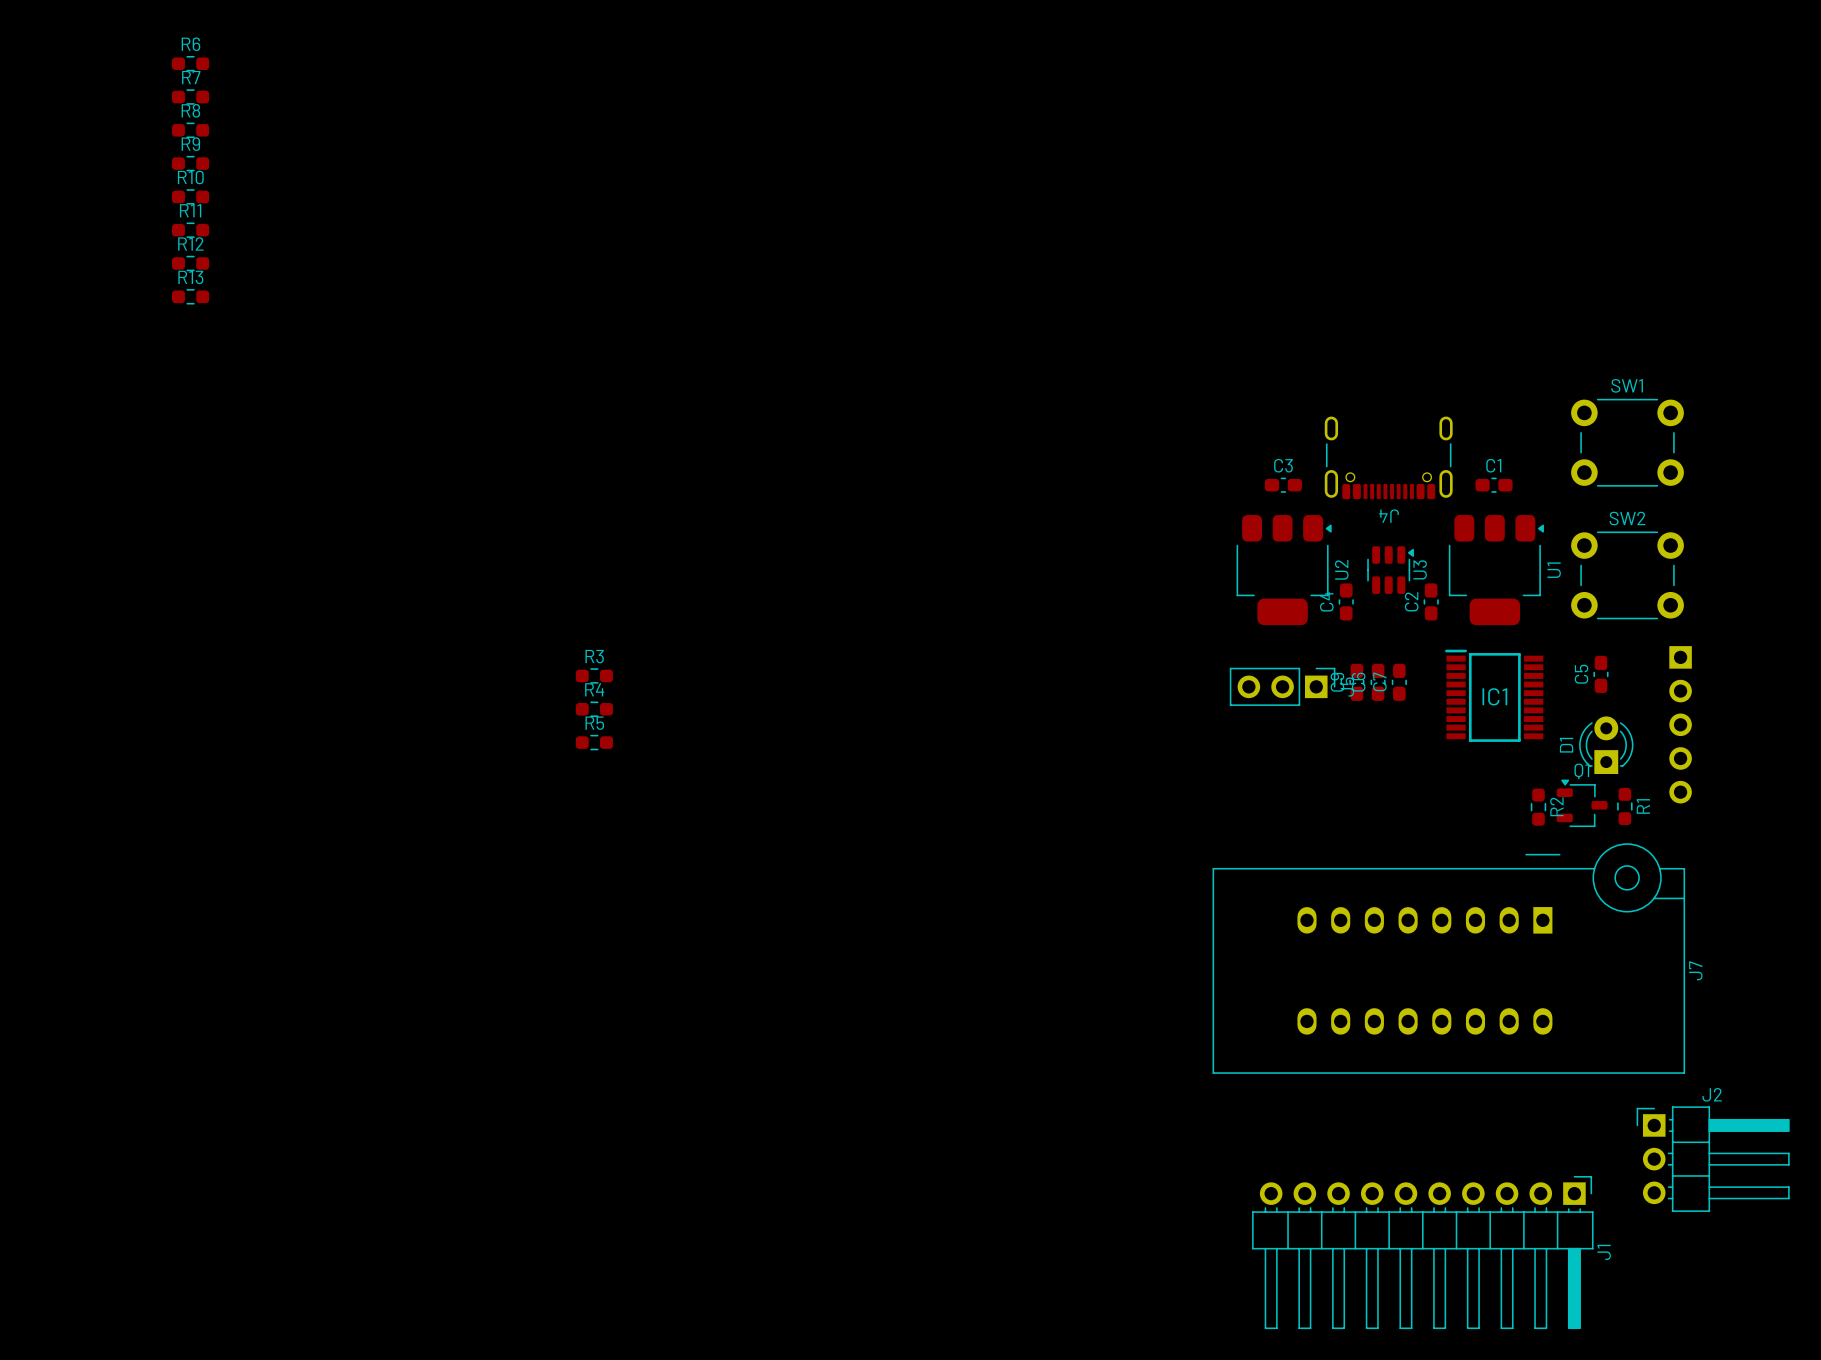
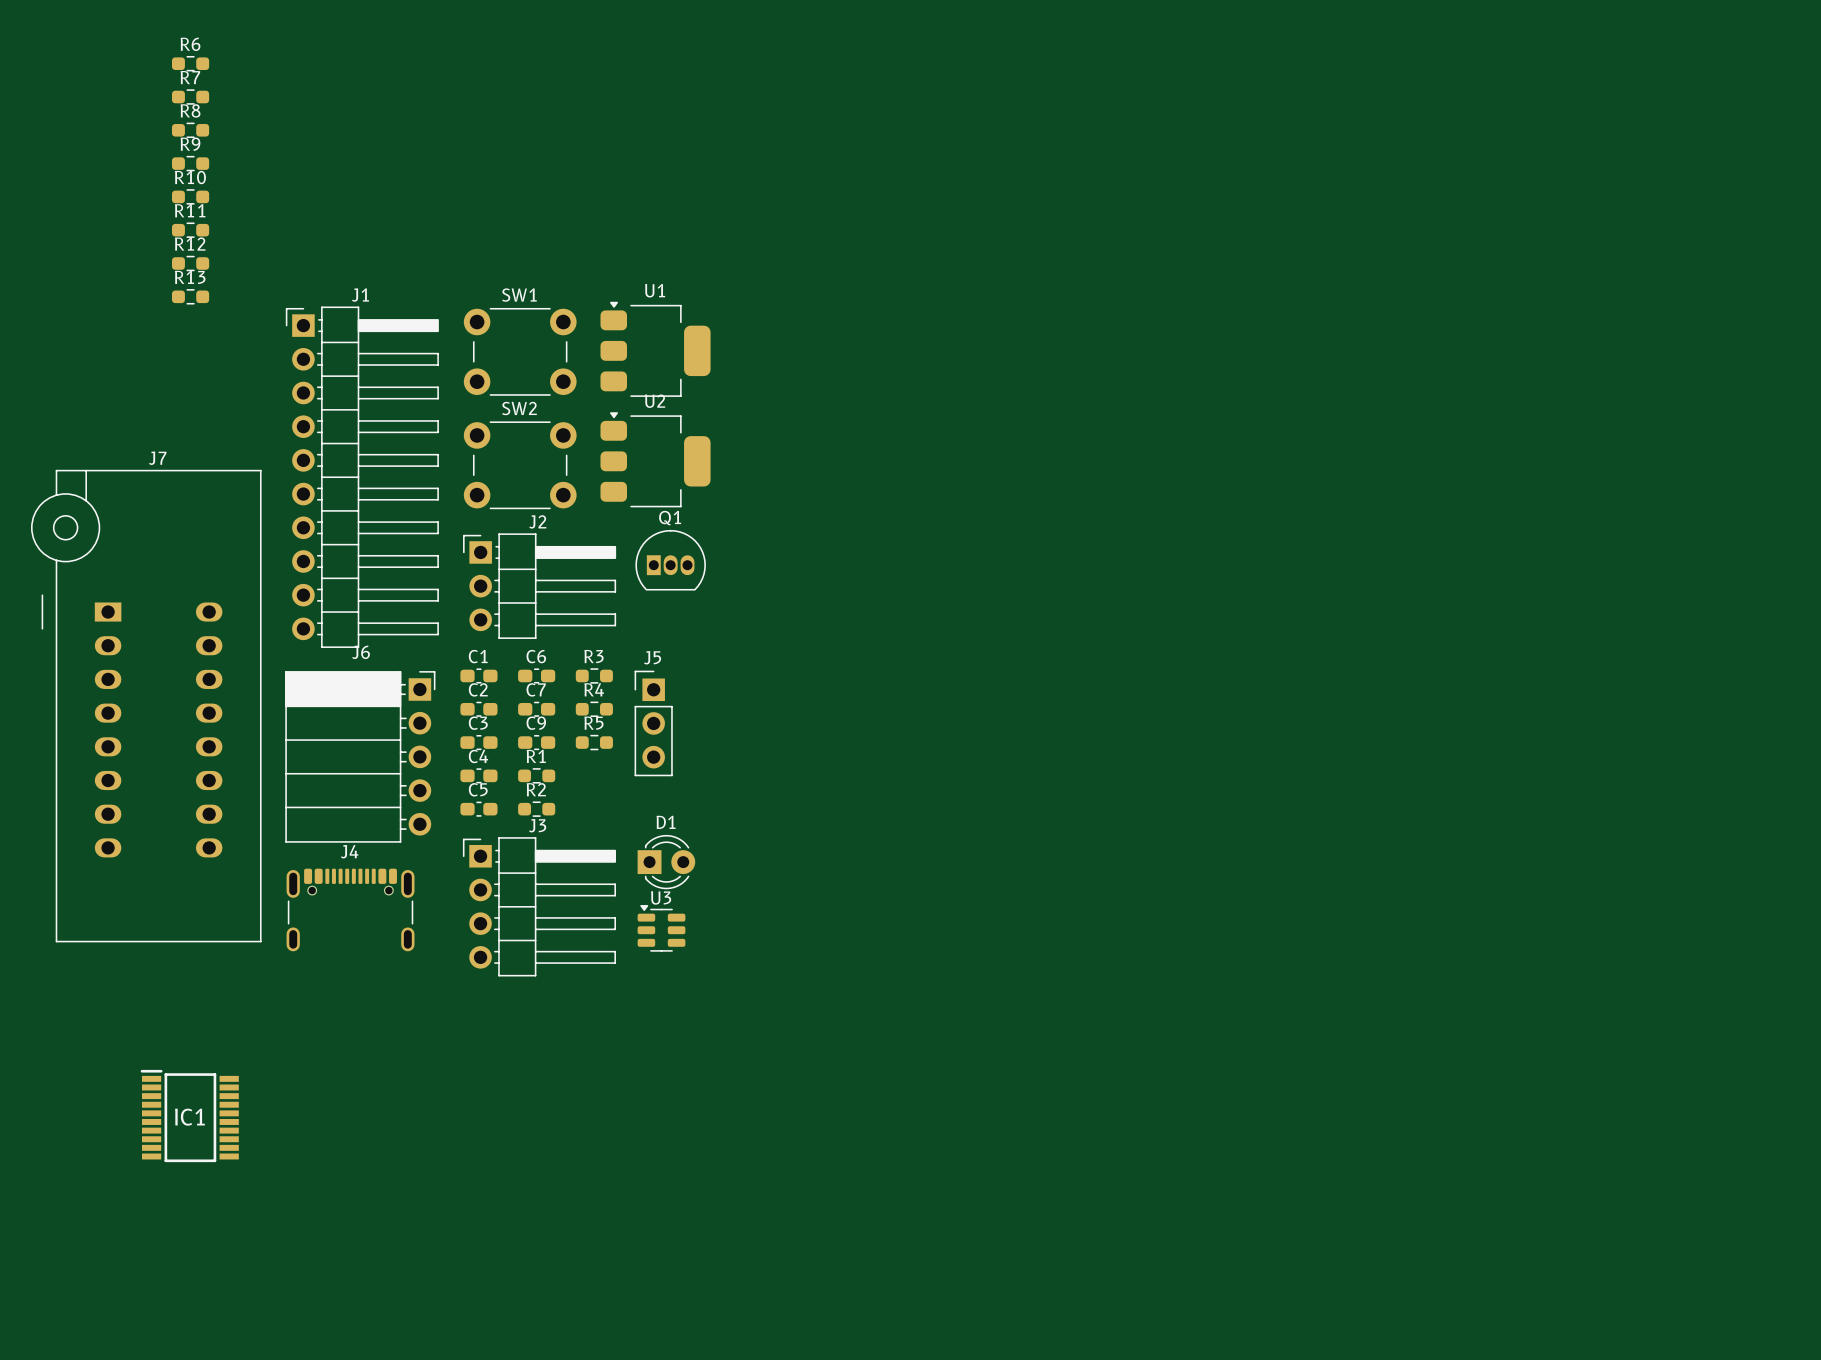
SW1 position: (1627, 442) -> (520, 351)
J4 rotation: 0° (1388, 457) -> 180° (350, 909)
J4 position: (1388, 457) -> (350, 909)
C3 position: (1283, 485) -> (478, 742)
C1 position: (1494, 485) -> (478, 675)
U2 rotation: 0° (1284, 570) -> 90° counterclockwise (655, 459)
U2 position: (1284, 570) -> (655, 459)
U3 rotation: 0° (1390, 570) -> 90° counterclockwise (661, 928)
U3 position: (1390, 570) -> (661, 928)
U1 rotation: 0° (1496, 570) -> 90° counterclockwise (655, 349)
U1 position: (1496, 570) -> (655, 349)
SW2 position: (1627, 575) -> (520, 465)
C4 rotation: 0° (1346, 601) -> 90° clockwise (478, 775)
C4 position: (1346, 601) -> (478, 775)
C2 rotation: 0° (1431, 601) -> 90° clockwise (478, 709)
C2 position: (1431, 601) -> (478, 709)
C5 rotation: 0° (1600, 674) -> 90° clockwise (478, 809)
C5 position: (1600, 674) -> (478, 809)
C9 rotation: 0° (1356, 682) -> 90° clockwise (536, 742)
C9 position: (1356, 682) -> (536, 742)
C6 rotation: 0° (1378, 682) -> 90° clockwise (536, 675)
C6 position: (1378, 682) -> (536, 675)
C7 rotation: 0° (1399, 682) -> 90° clockwise (536, 709)
C7 position: (1399, 682) -> (536, 709)
J5 rotation: 0° (1282, 686) -> 90° counterclockwise (653, 723)
J5 position: (1282, 686) -> (653, 723)
IC1 position: (1494, 695) -> (189, 1116)
part: (1680, 724) -> none
D1 rotation: 0° (1606, 745) -> 90° clockwise (666, 862)
D1 position: (1606, 745) -> (666, 862)
J6: none -> (360, 756)
Q1 footprint: [1556, 779, 1608, 828] -> [635, 529, 706, 591]
R2 name position: R2 (1556, 806) -> R2 (536, 789)
R1 rotation: 0° (1624, 806) -> 90° clockwise (536, 775)
R1 position: (1624, 806) -> (536, 775)
R1 name position: R1 (1643, 806) -> R1 (536, 756)
R2 rotation: 0° (1538, 807) -> 90° clockwise (536, 809)
R2 position: (1538, 807) -> (536, 809)
J3: none -> (539, 906)
J7 rotation: 0° (1448, 958) -> 90° counterclockwise (146, 706)
J7 position: (1448, 958) -> (146, 706)
J2 position: (1713, 1159) -> (539, 586)
J1 rotation: 0° (1422, 1252) -> 90° counterclockwise (362, 477)
J1 position: (1422, 1252) -> (362, 477)

